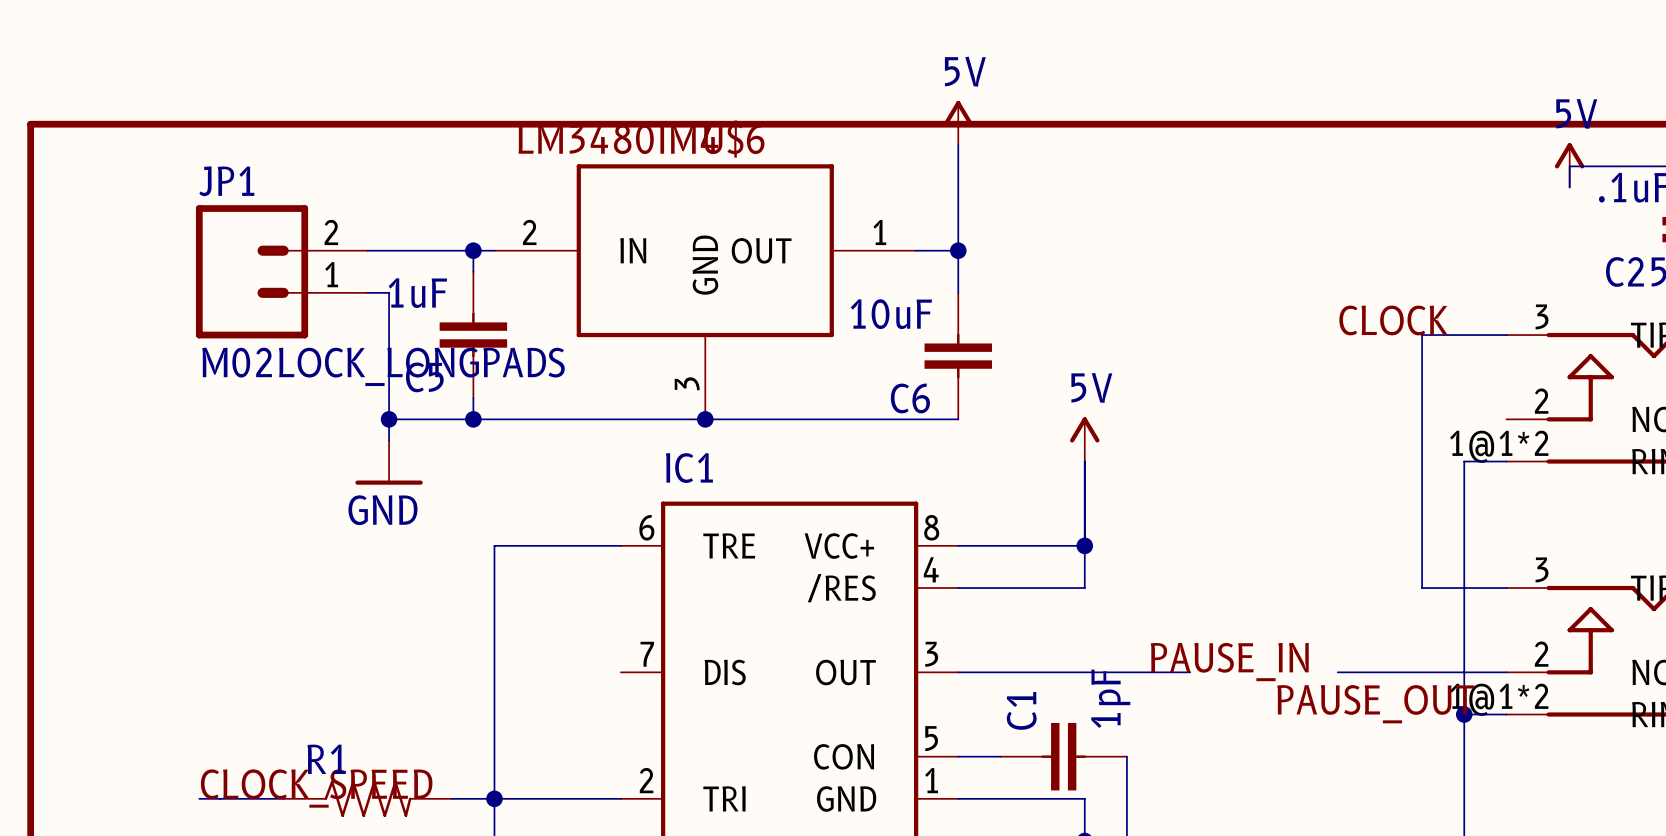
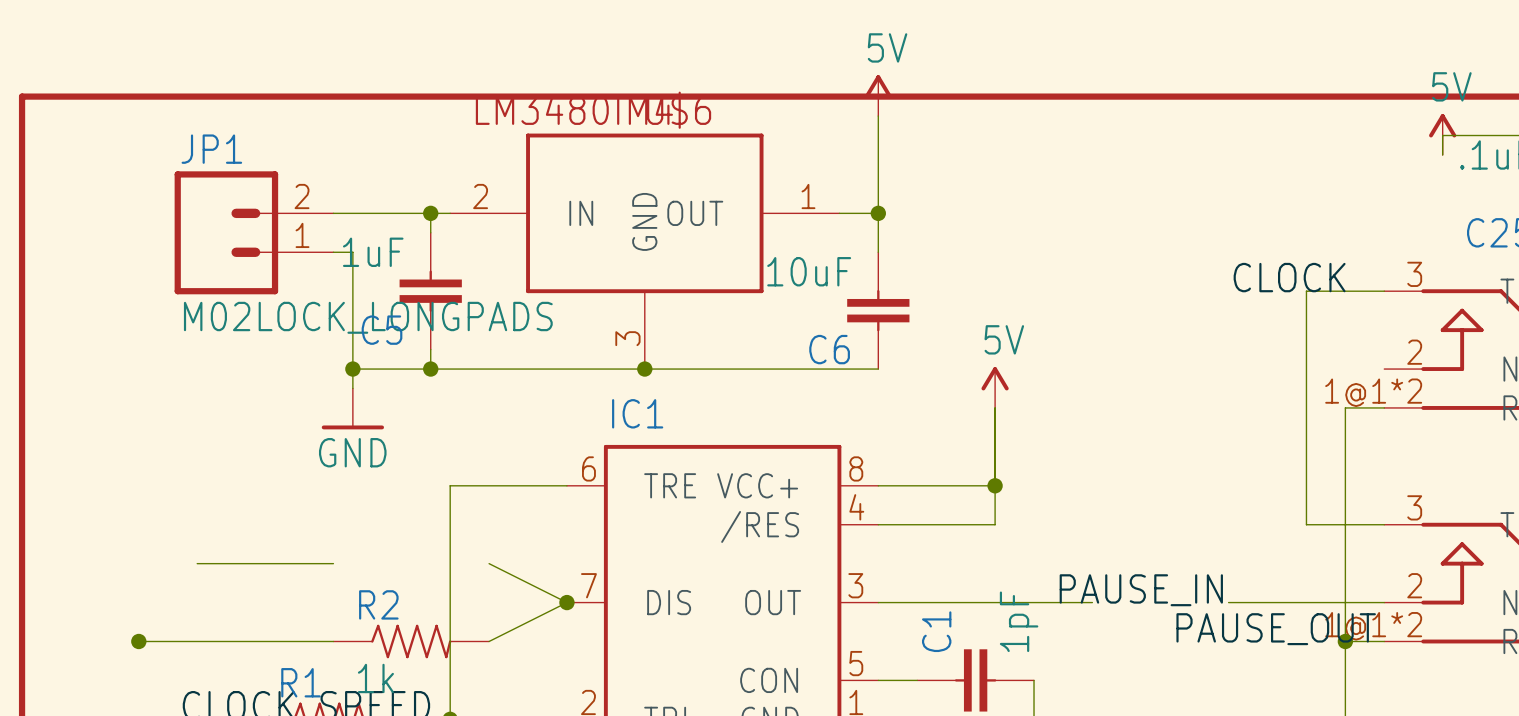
wire: none -> (197, 563) (333, 563)
wire: none -> (489, 563) (566, 602) (489, 641)
junction: none -> (566, 602)
wire: none -> (138, 641) (333, 641)
junction: none -> (138, 641)
R2: none -> 1k (411, 641)

